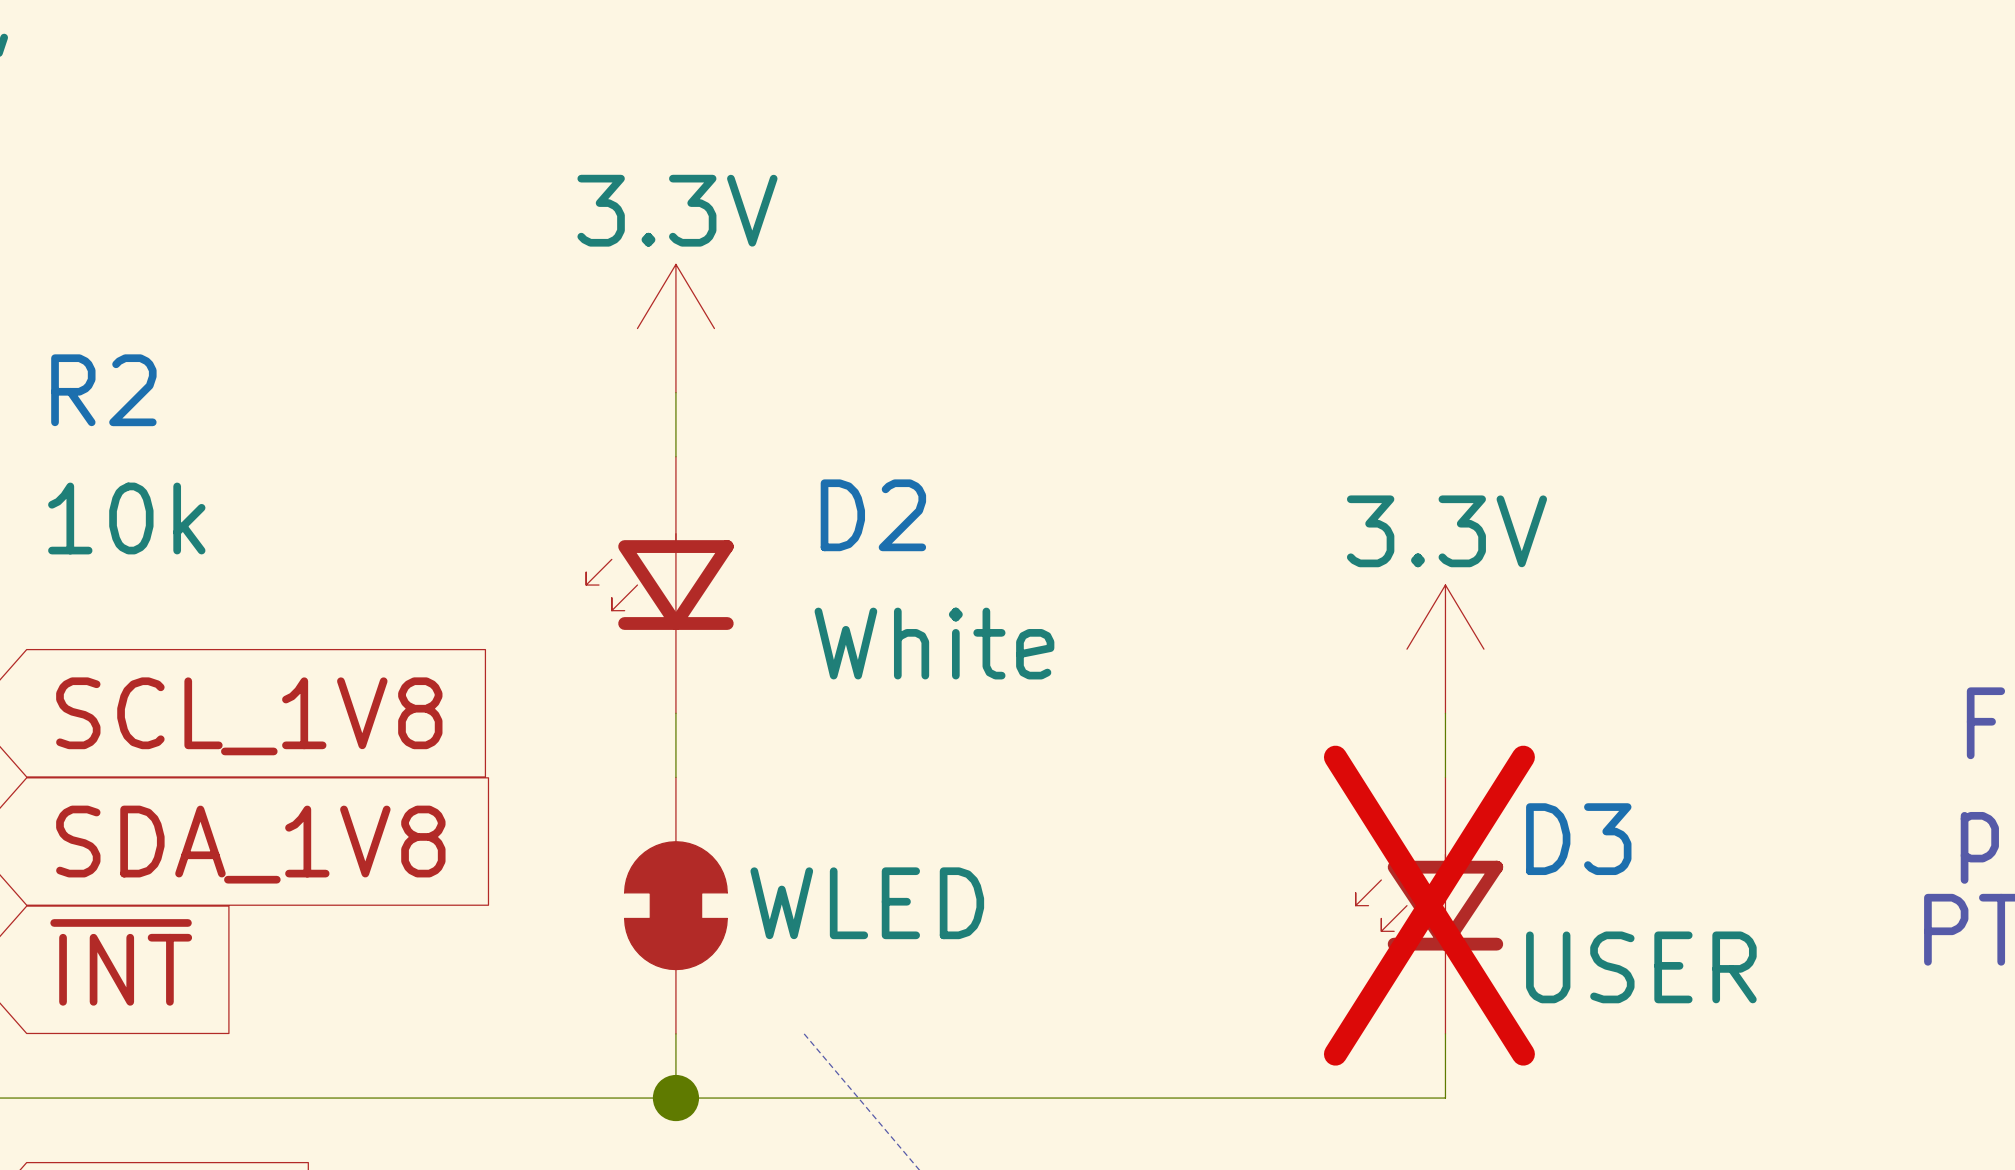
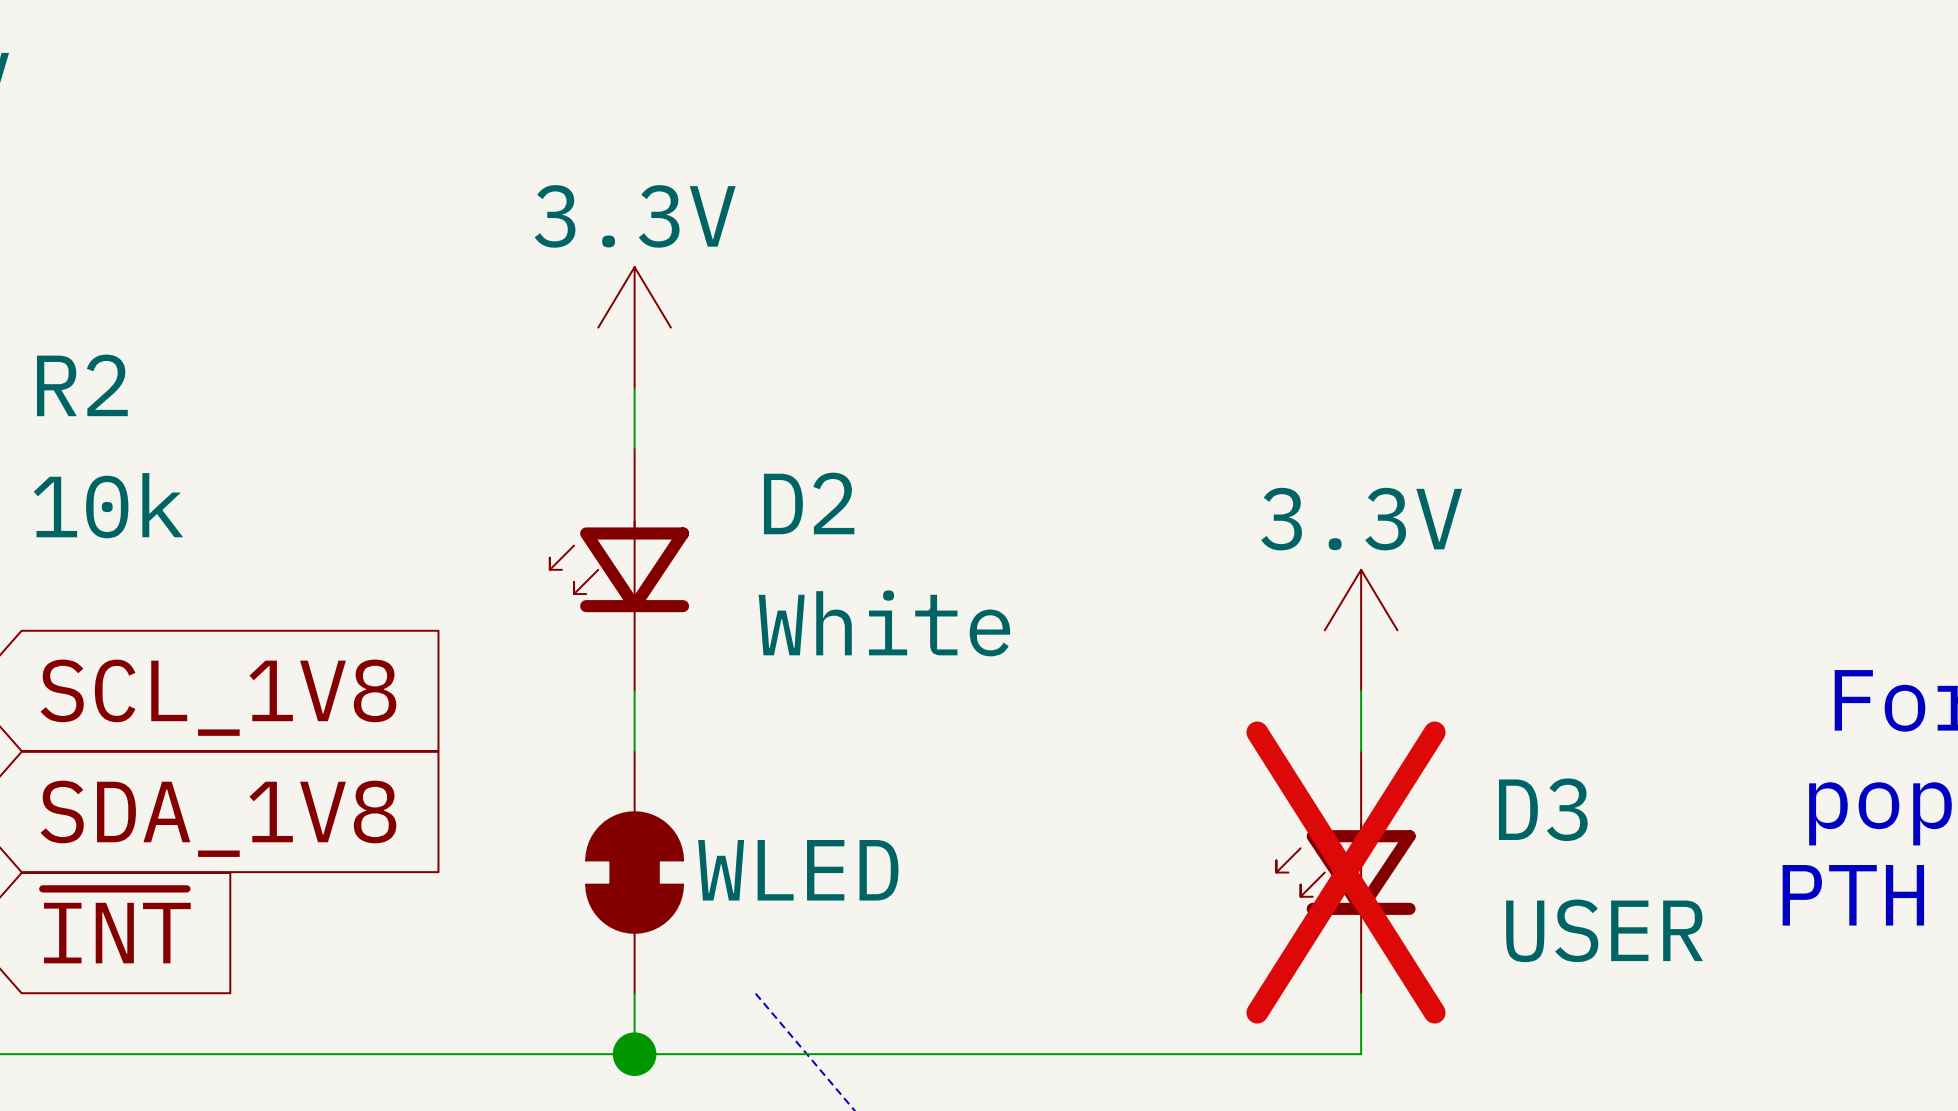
D3 name position: D3 (1578, 839) -> D3 (1543, 809)
D3 value position: USER (1641, 967) -> USER (1604, 930)

